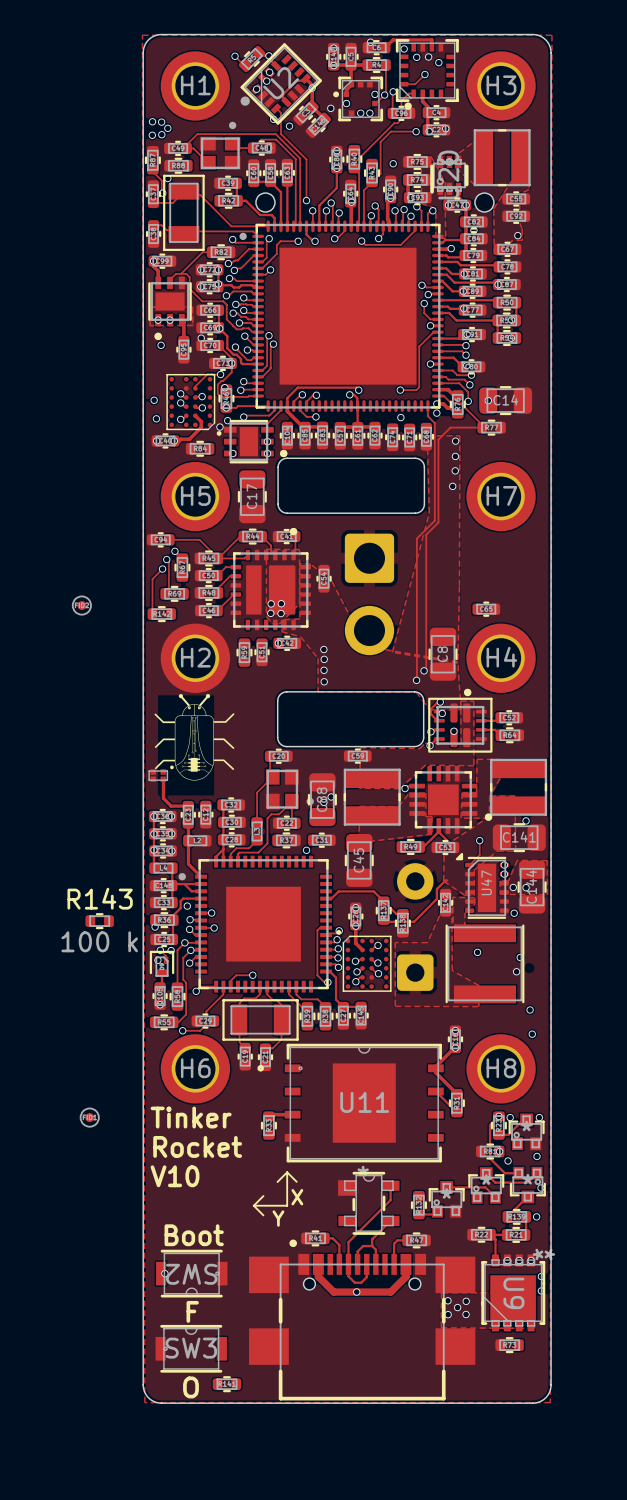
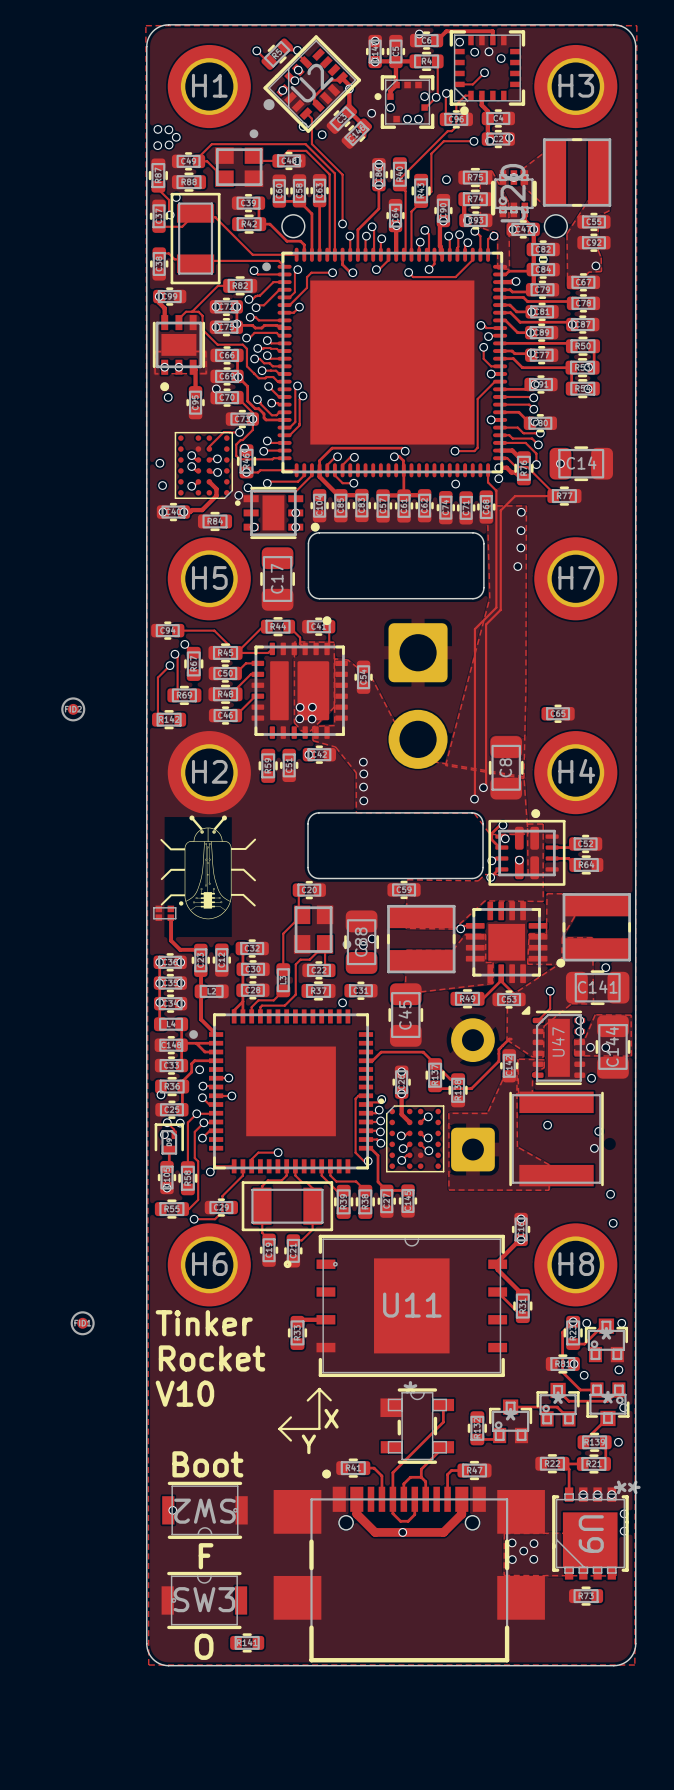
R143: 100 k (99, 921) -> none

